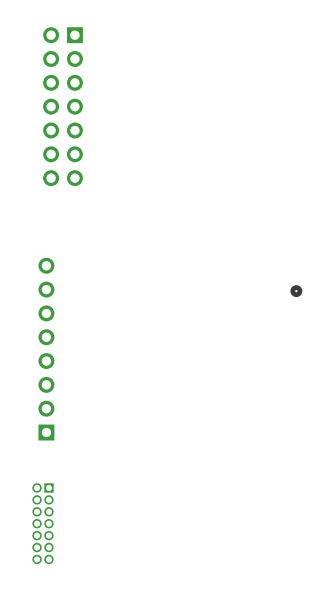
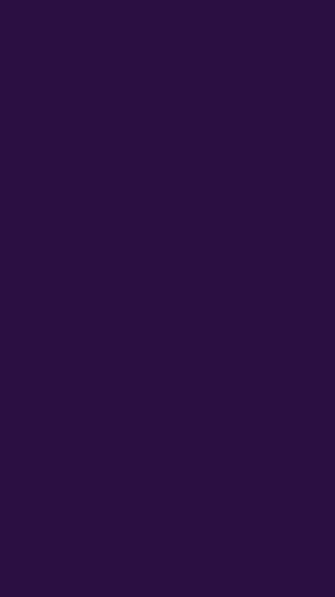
part: (63, 106) -> none
part: (296, 291) -> none
part: (46, 349) -> none
part: (43, 523) -> none

